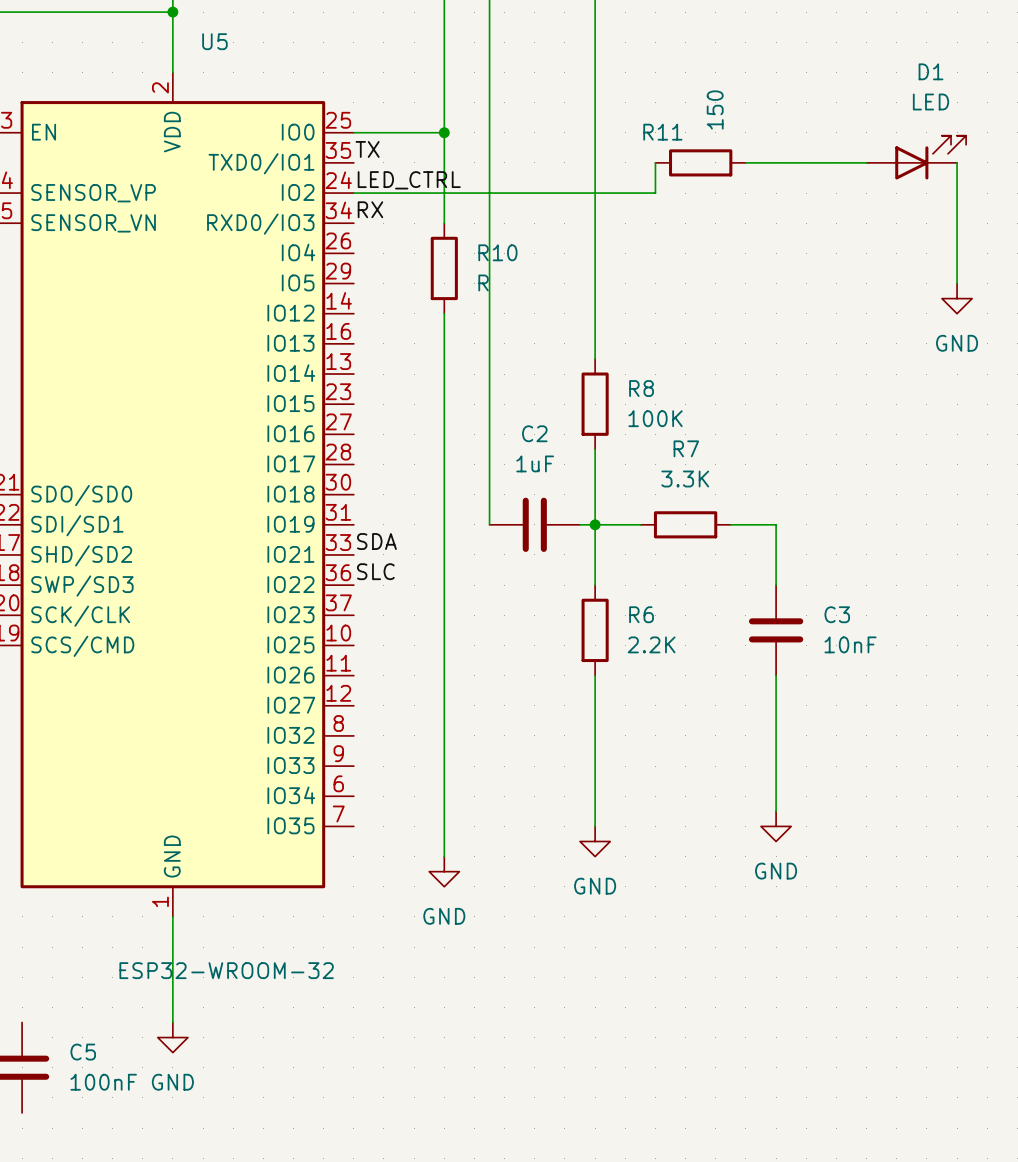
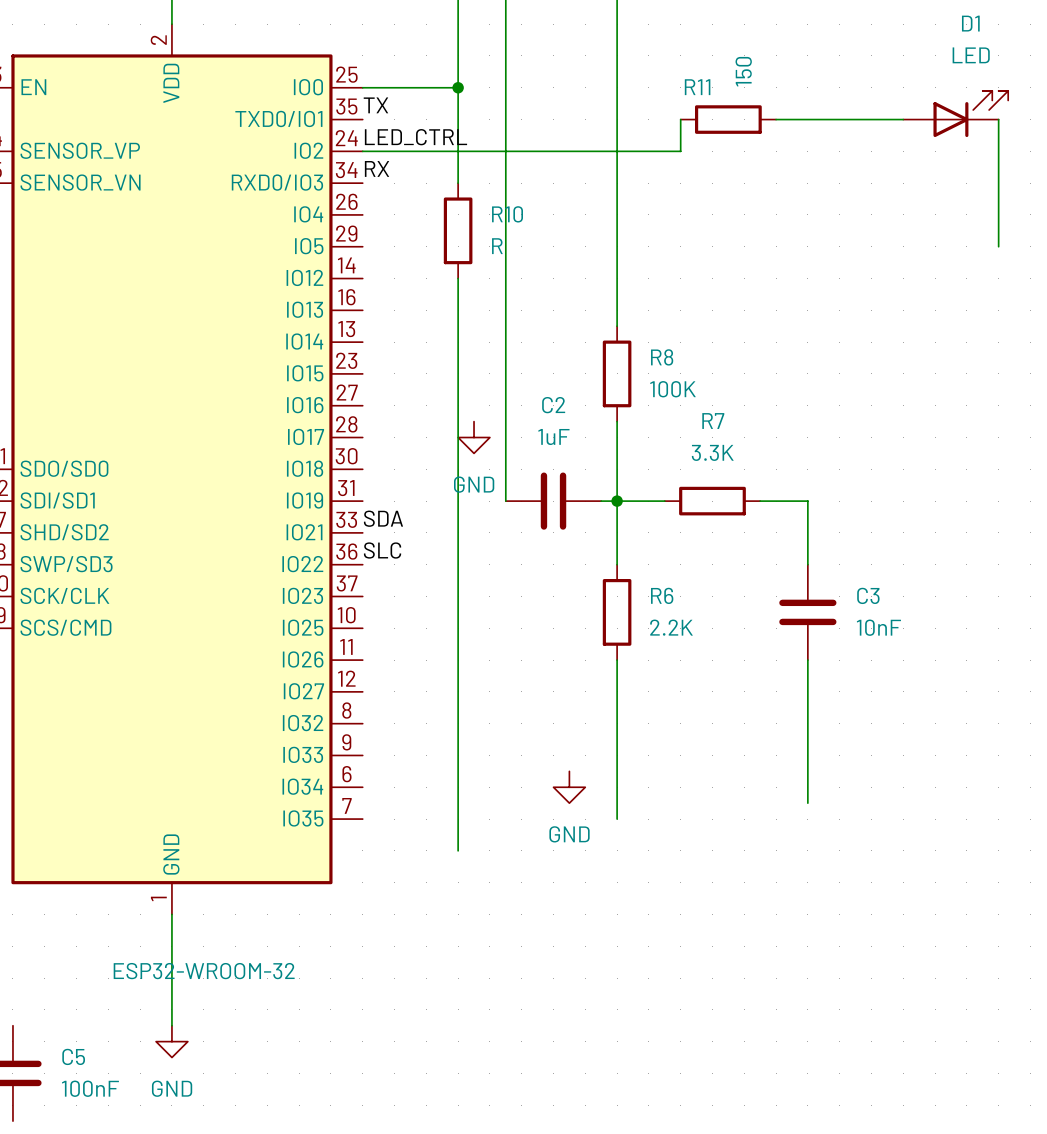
power symbol: GND (957, 298) -> none
power symbol: none -> GND (474, 437)
power symbol: GND (776, 826) -> none
power symbol position: GND (595, 841) -> GND (569, 787)
power symbol: GND (444, 871) -> none

